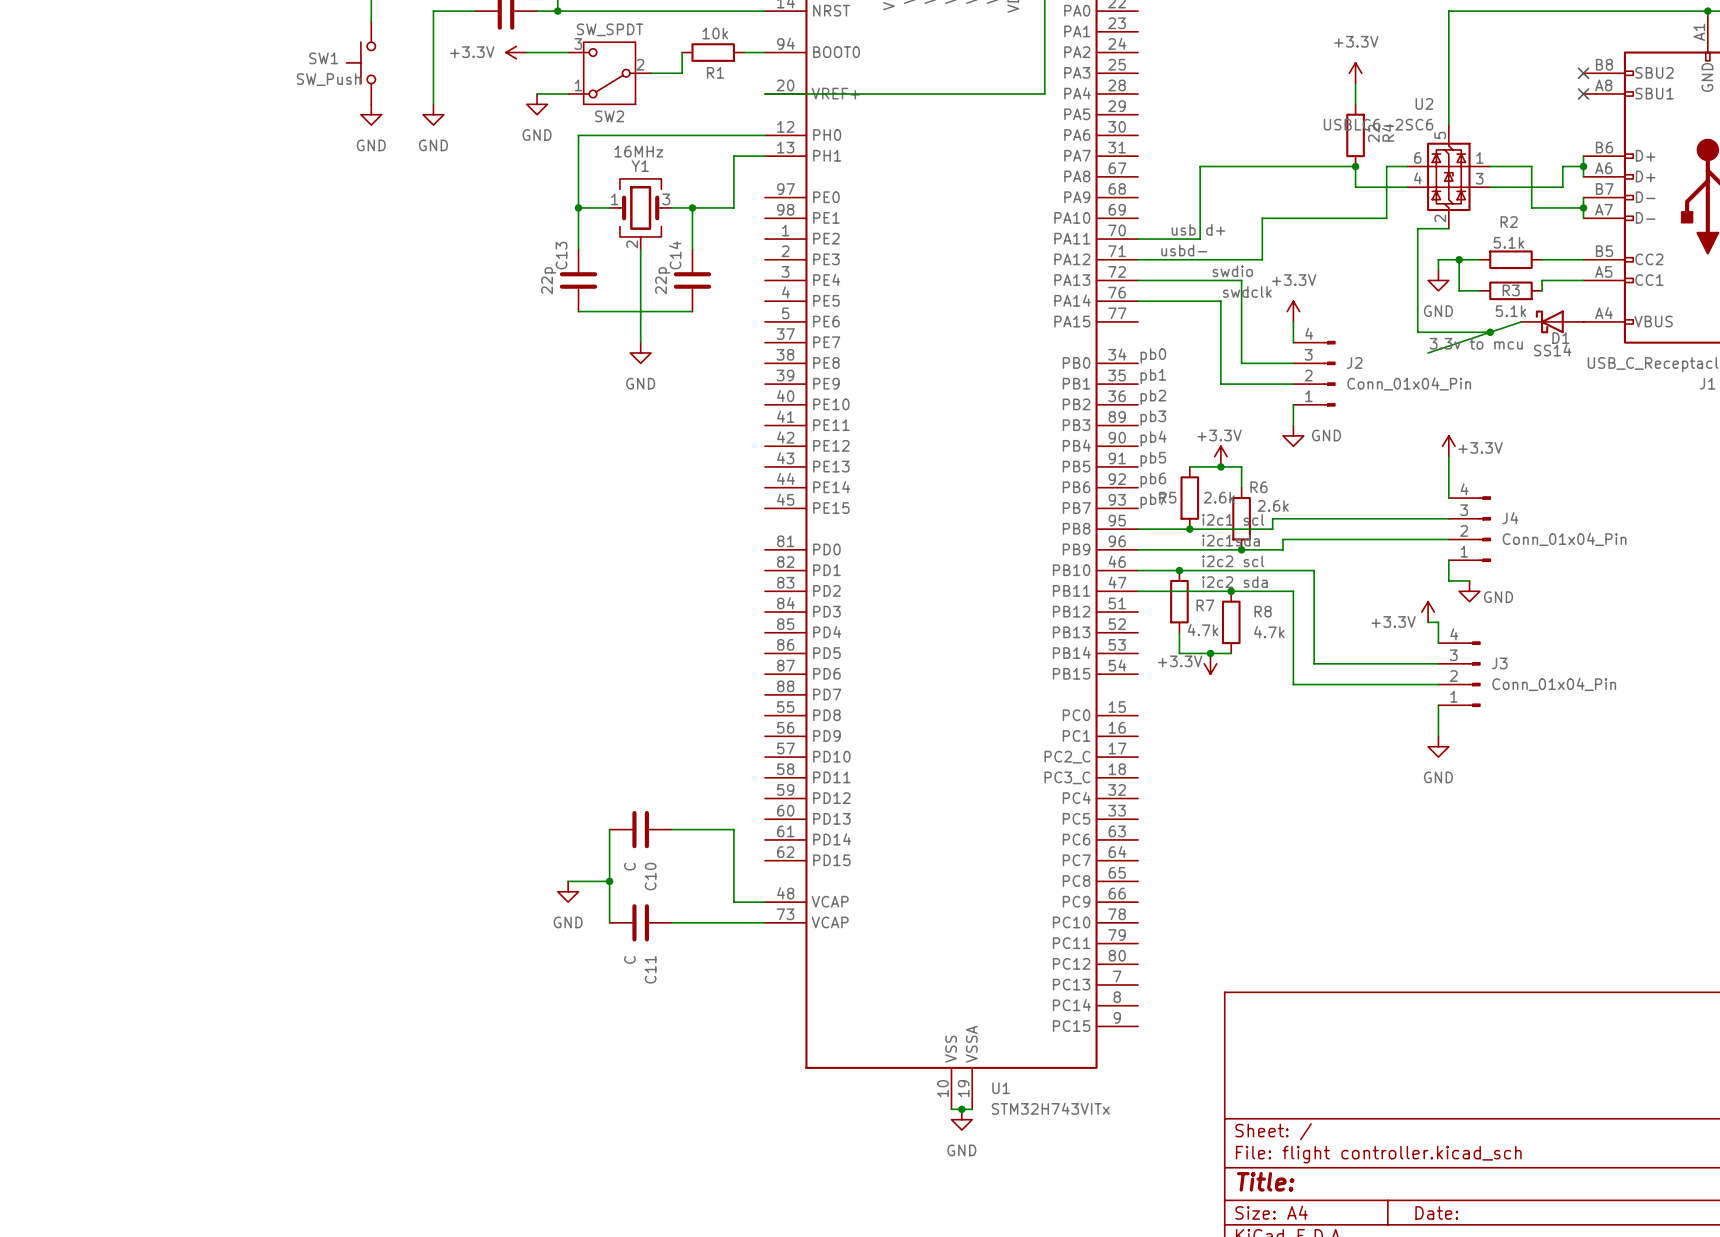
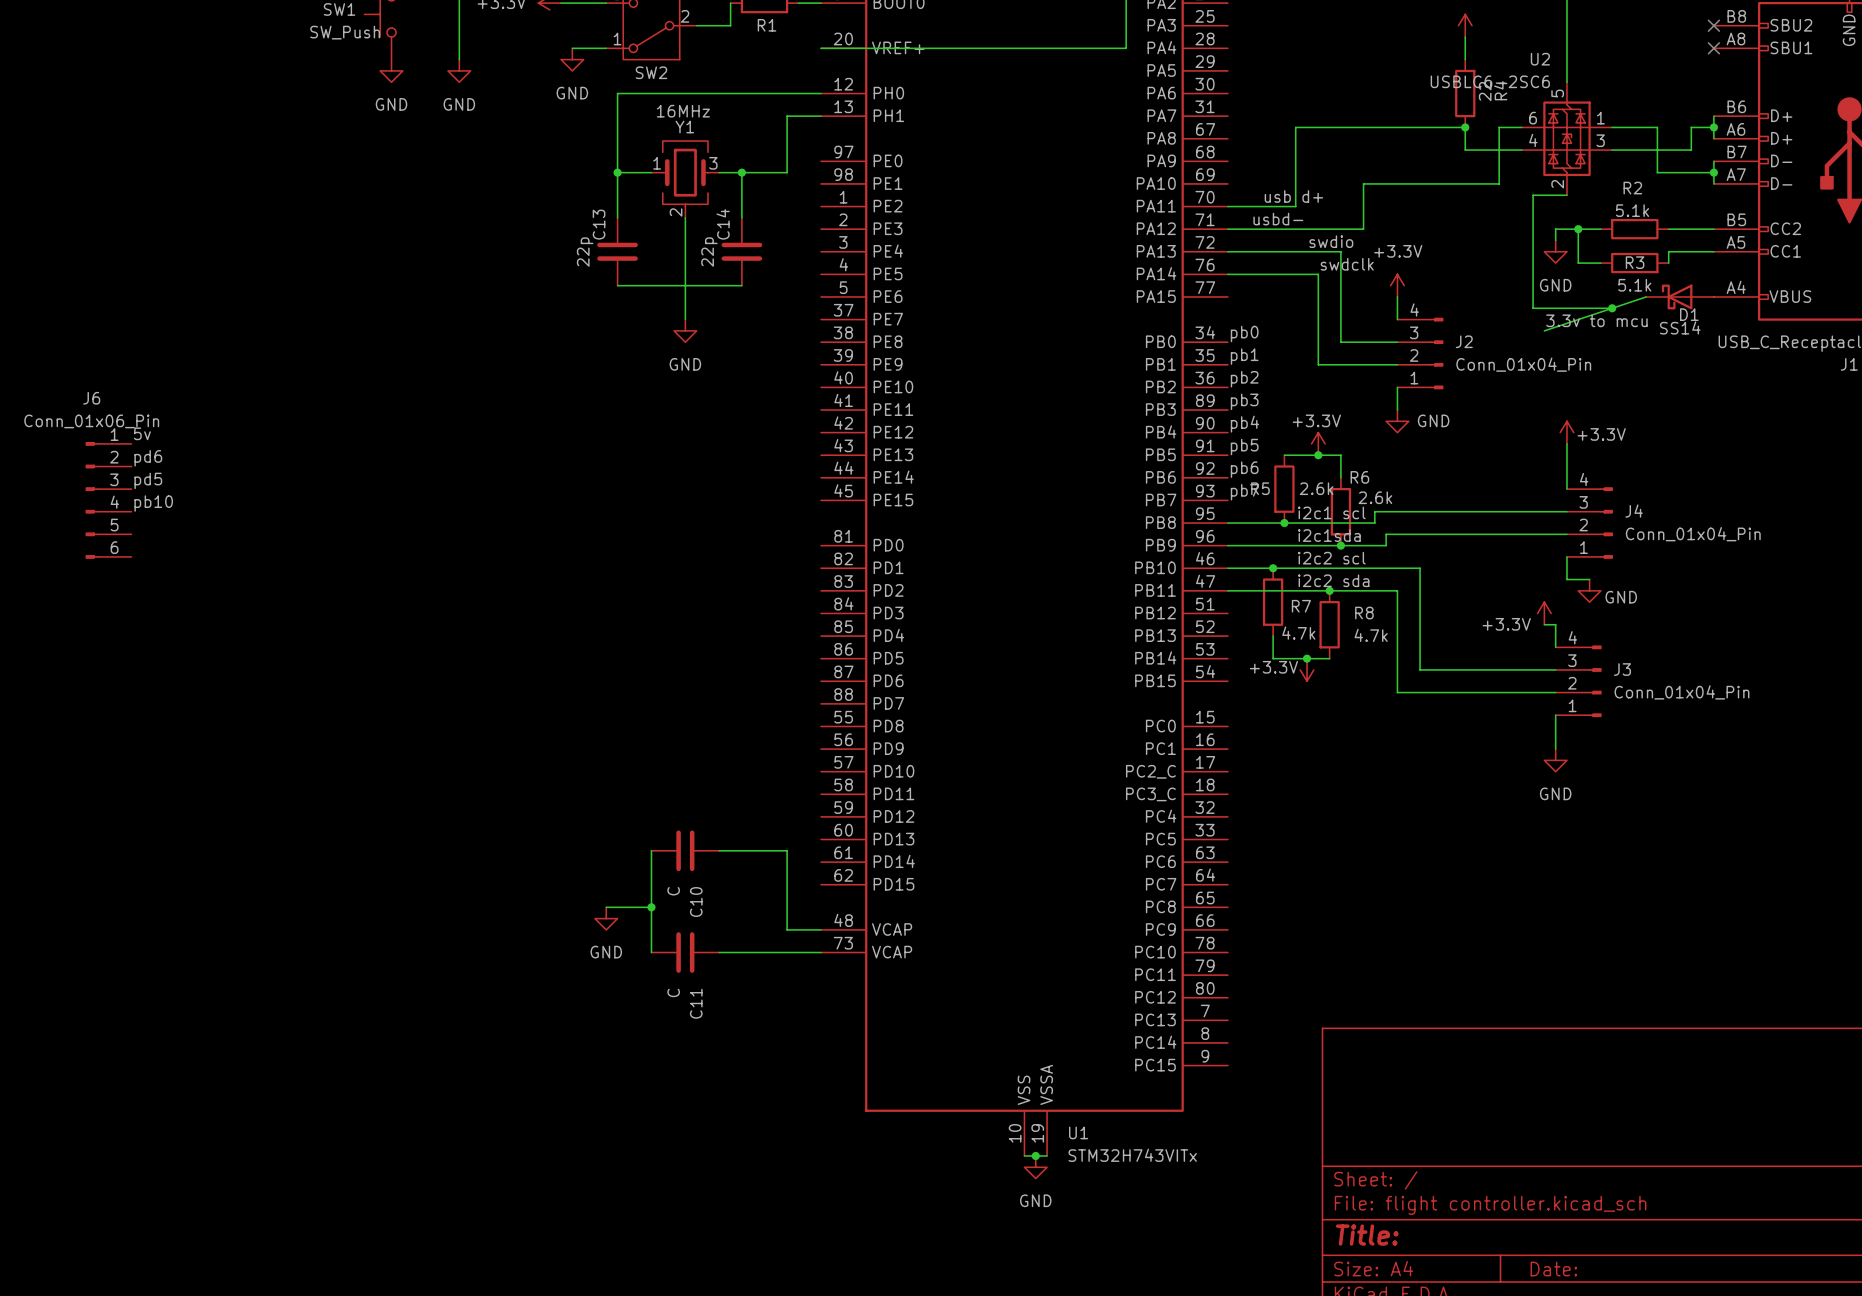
label: none -> 5v (142, 433)
label: none -> pd6 (148, 458)
label: none -> pd5 (148, 480)
J6: none -> Conn_01x06_Pin (108, 500)
label: none -> pb10 (153, 503)

